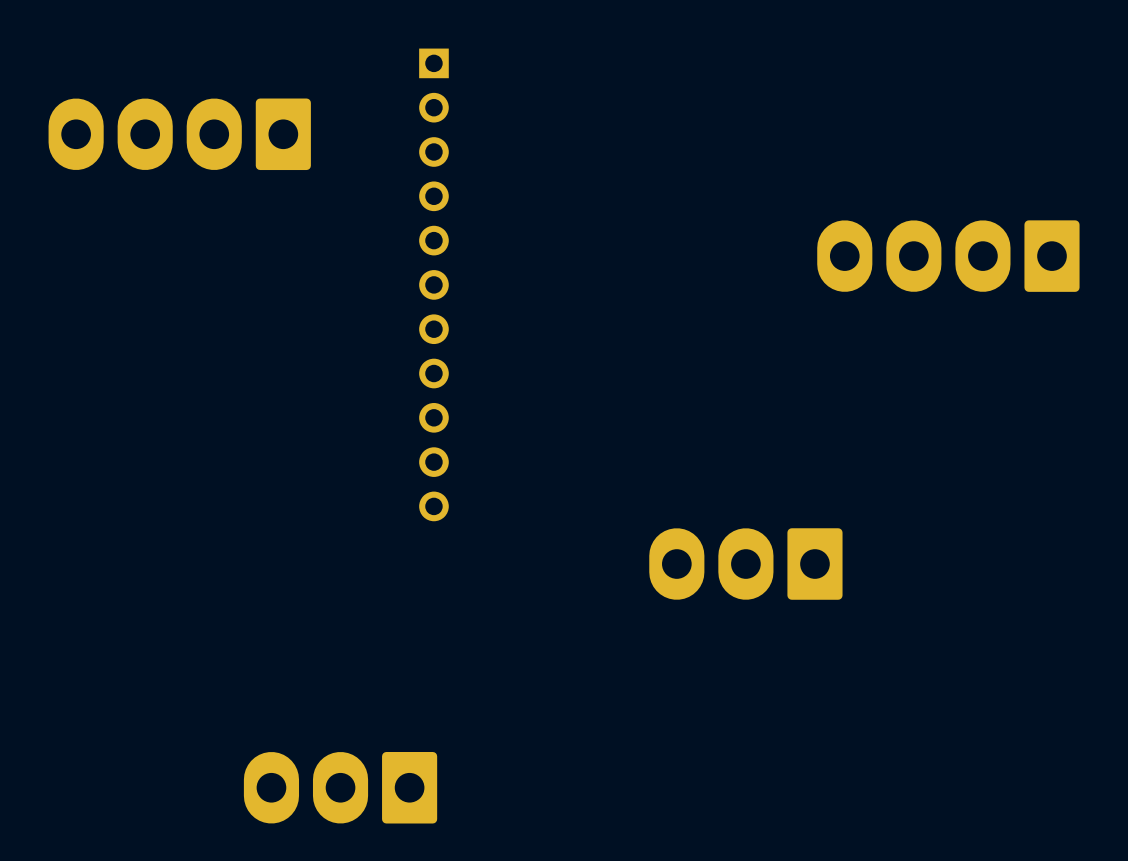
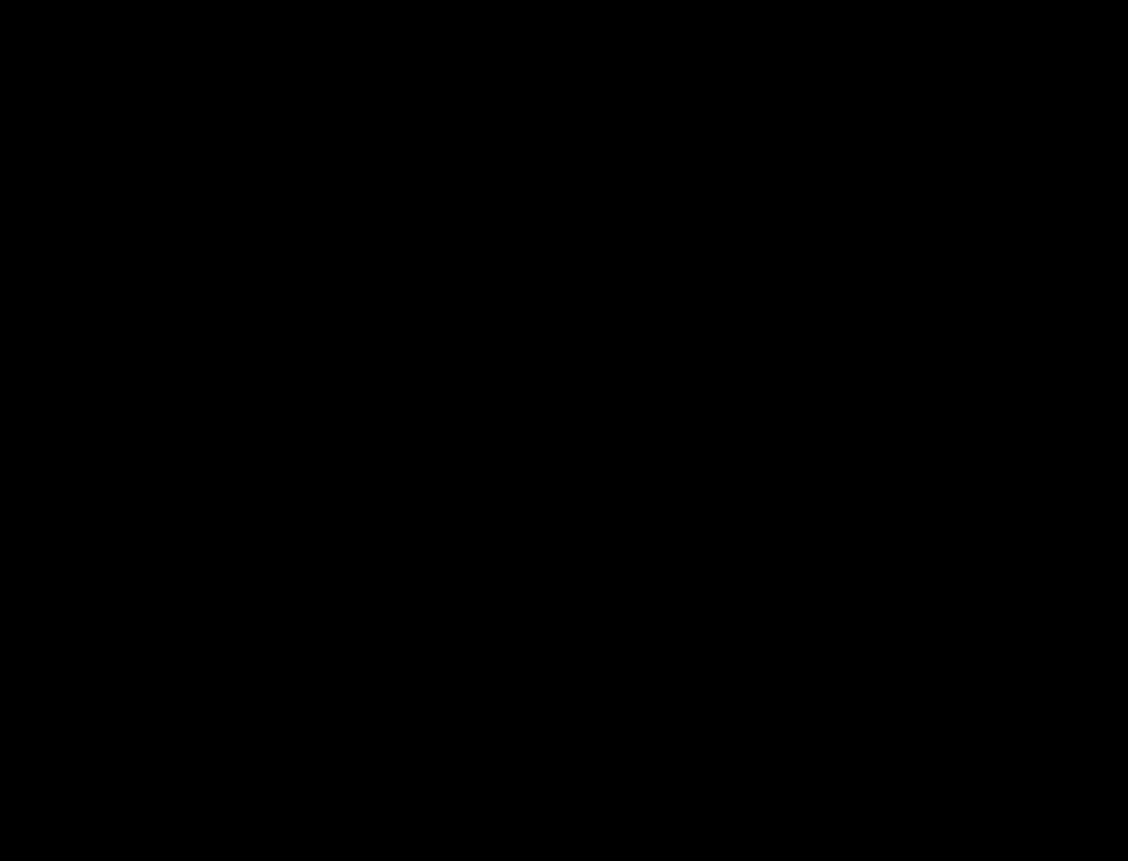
part: (179, 134) -> none
part: (948, 256) -> none
part: (433, 284) -> none
part: (745, 564) -> none
part: (340, 787) -> none

